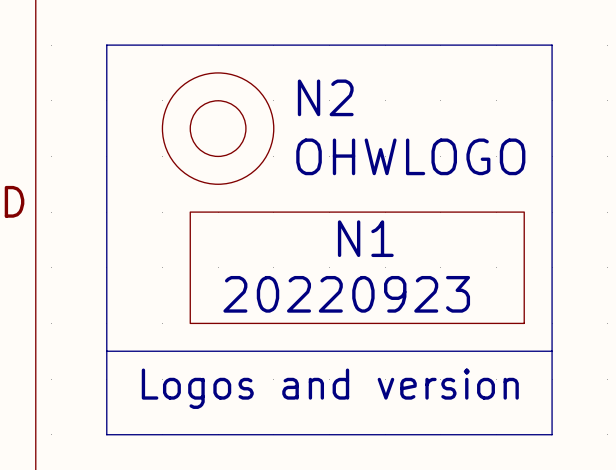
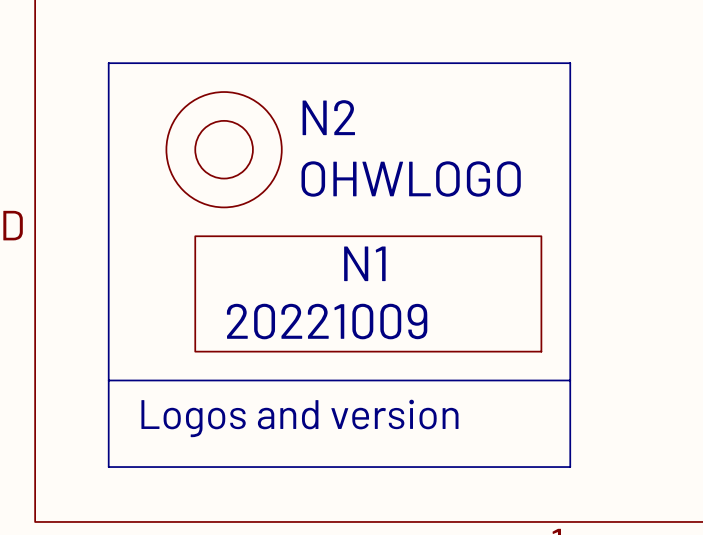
N1 value: 20220923 (346, 294) -> 20221009 (327, 321)

